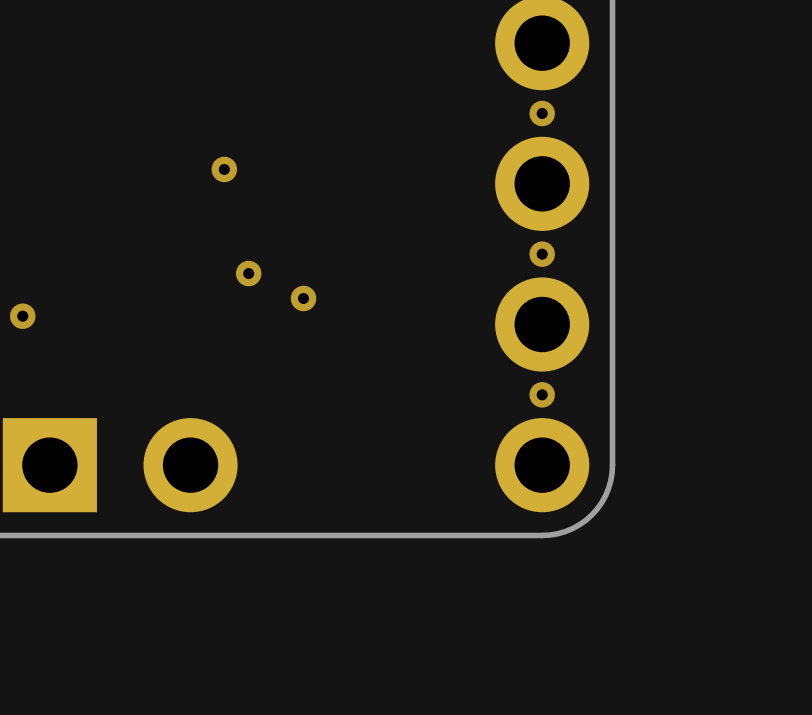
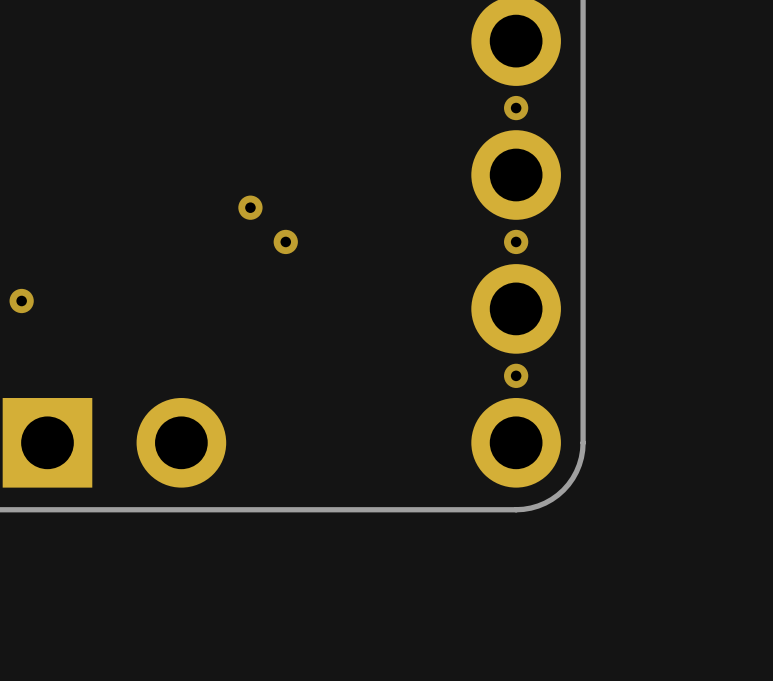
via: (224, 169) -> none
via: none -> (250, 207)
via: none -> (285, 241)
via: (248, 273) -> none
via: (303, 298) -> none

